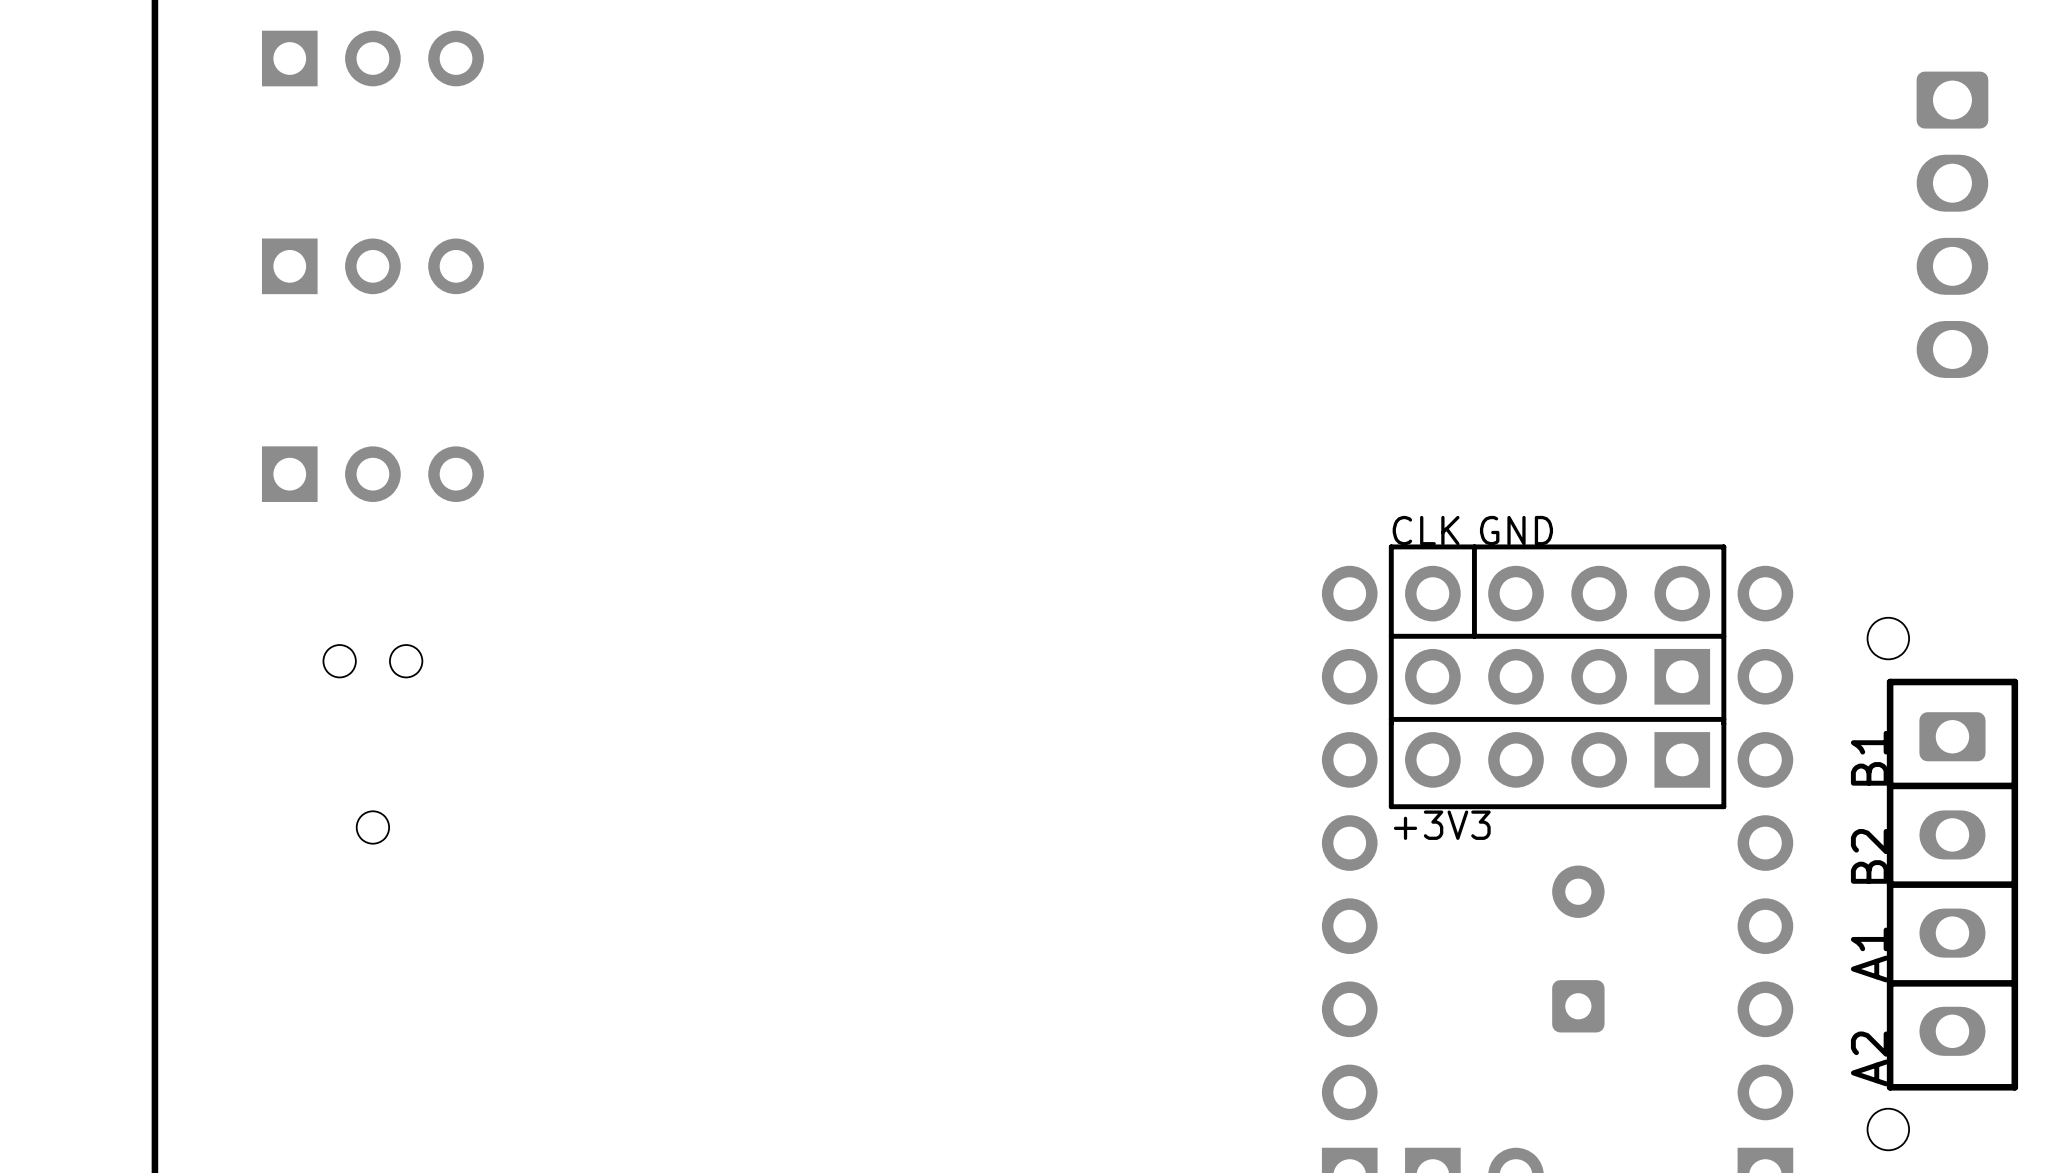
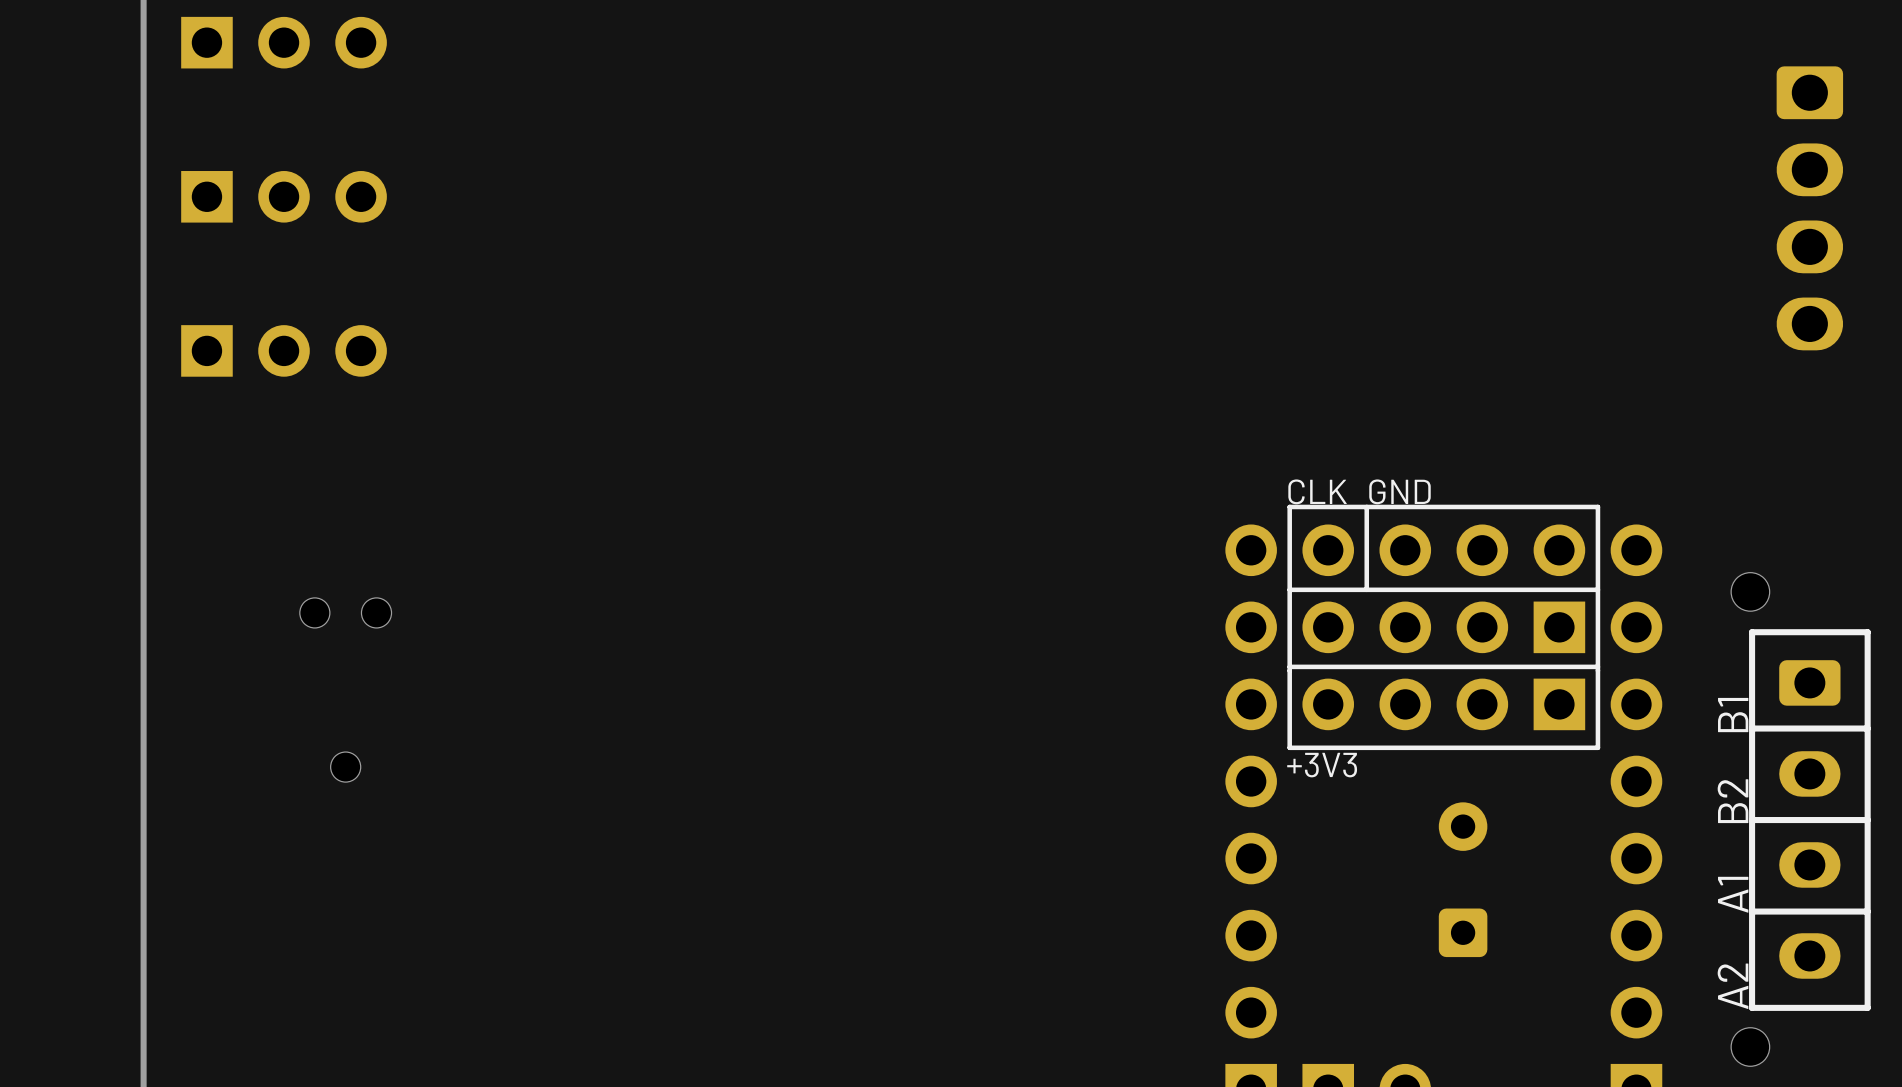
part position: (372, 58) -> (284, 42)
part: none -> (284, 196)
part: (372, 266) -> none
part: none -> (284, 350)
part: (372, 474) -> none

